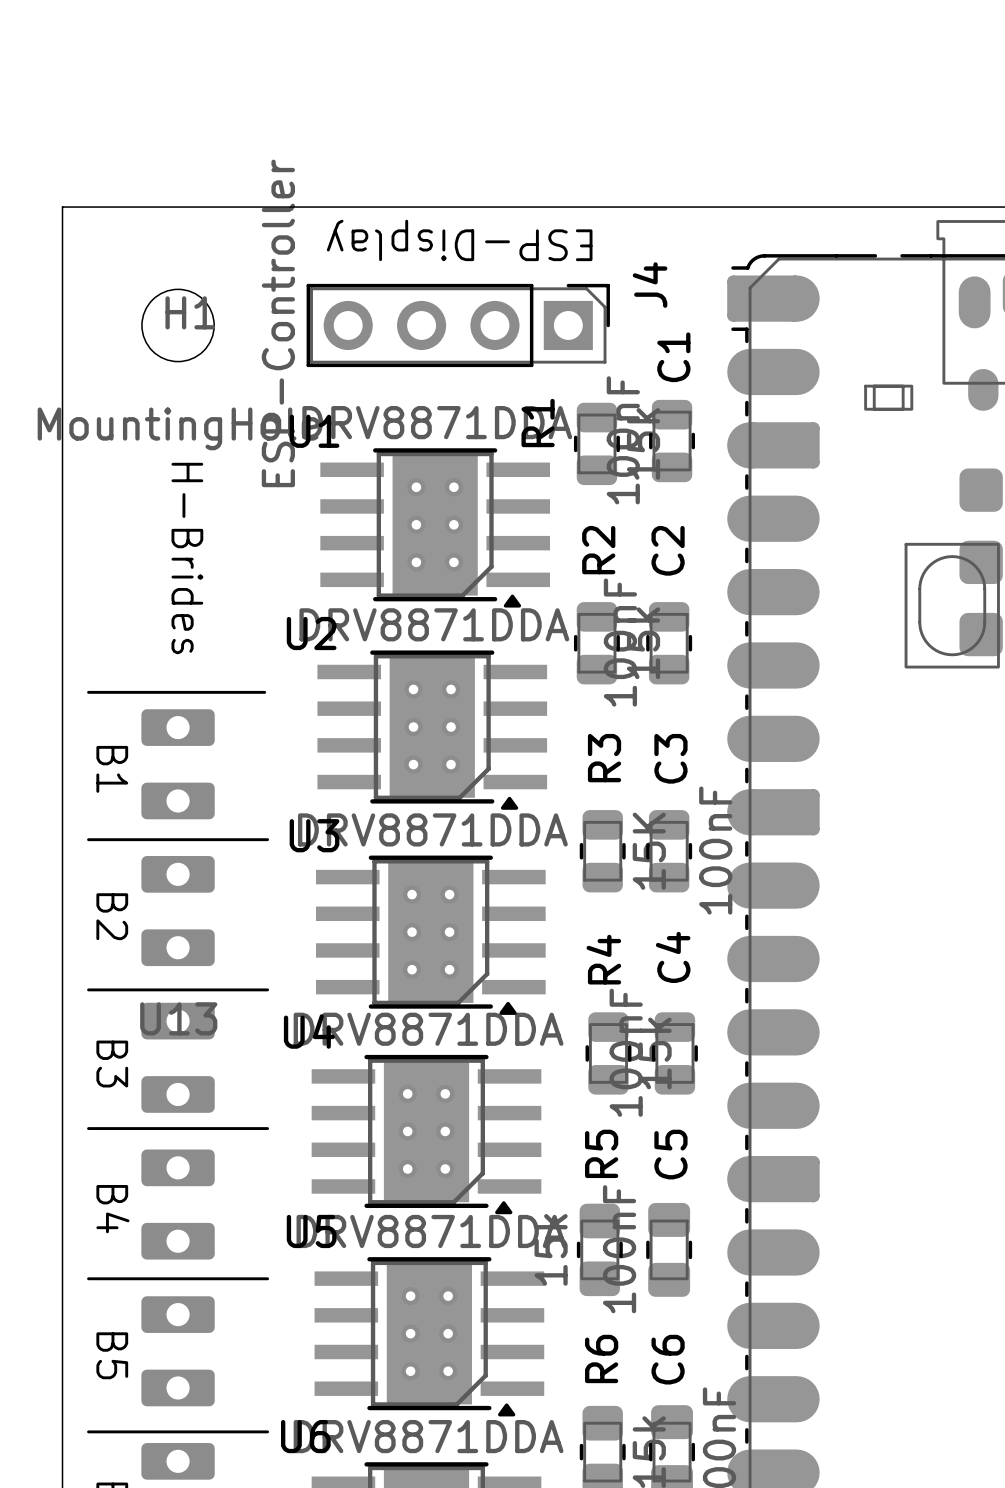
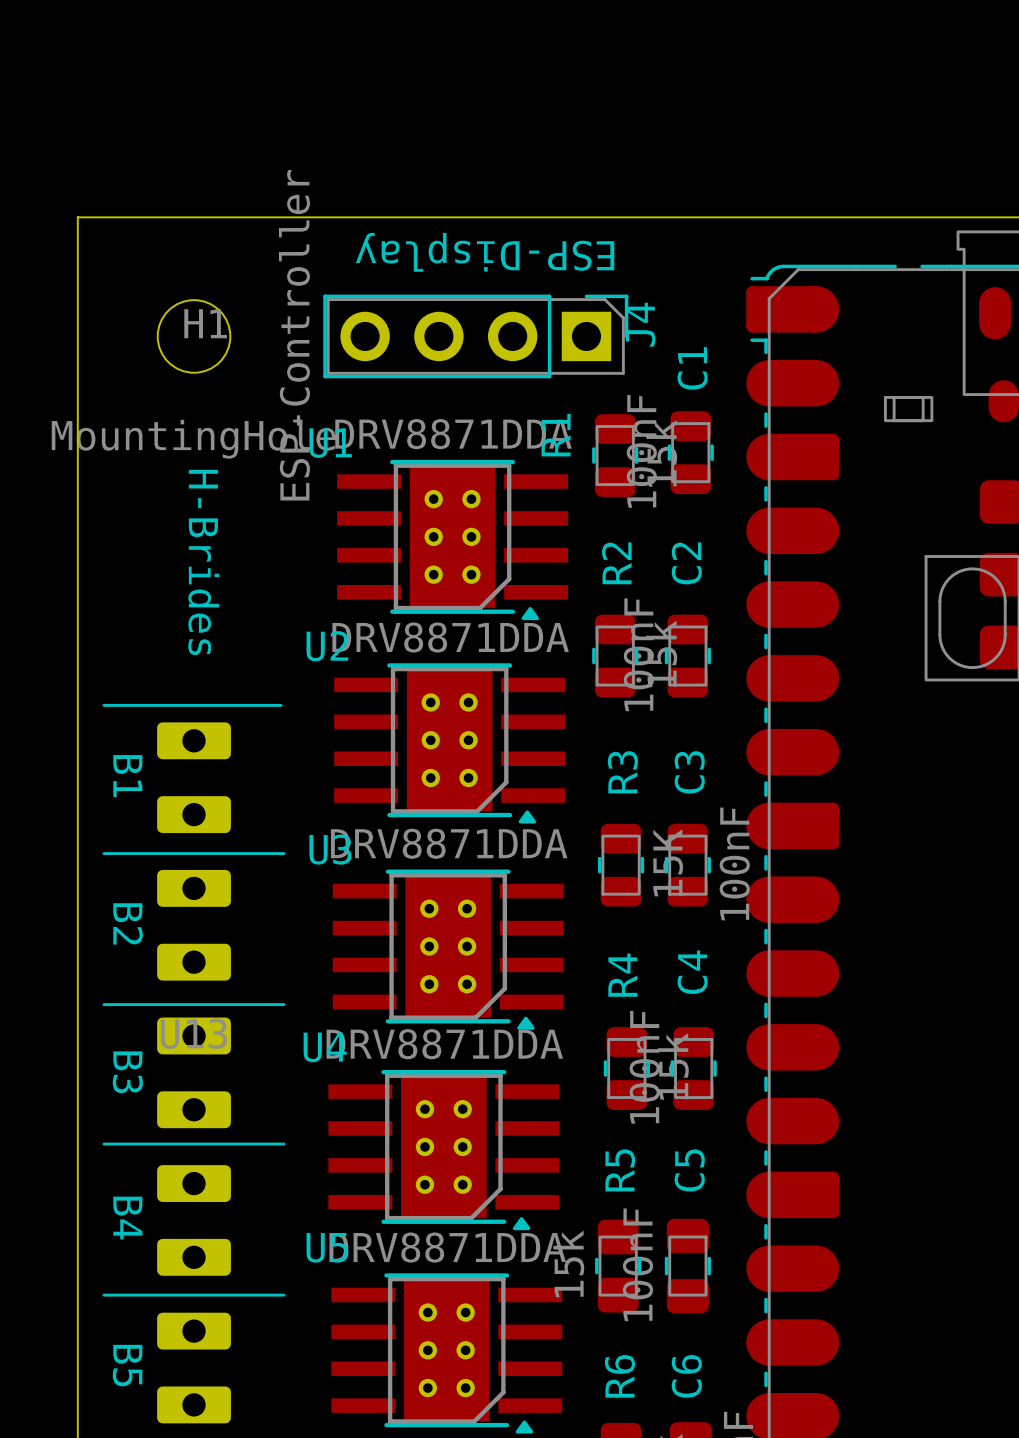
J4 name position: J4 (650, 285) -> J4 (640, 324)

